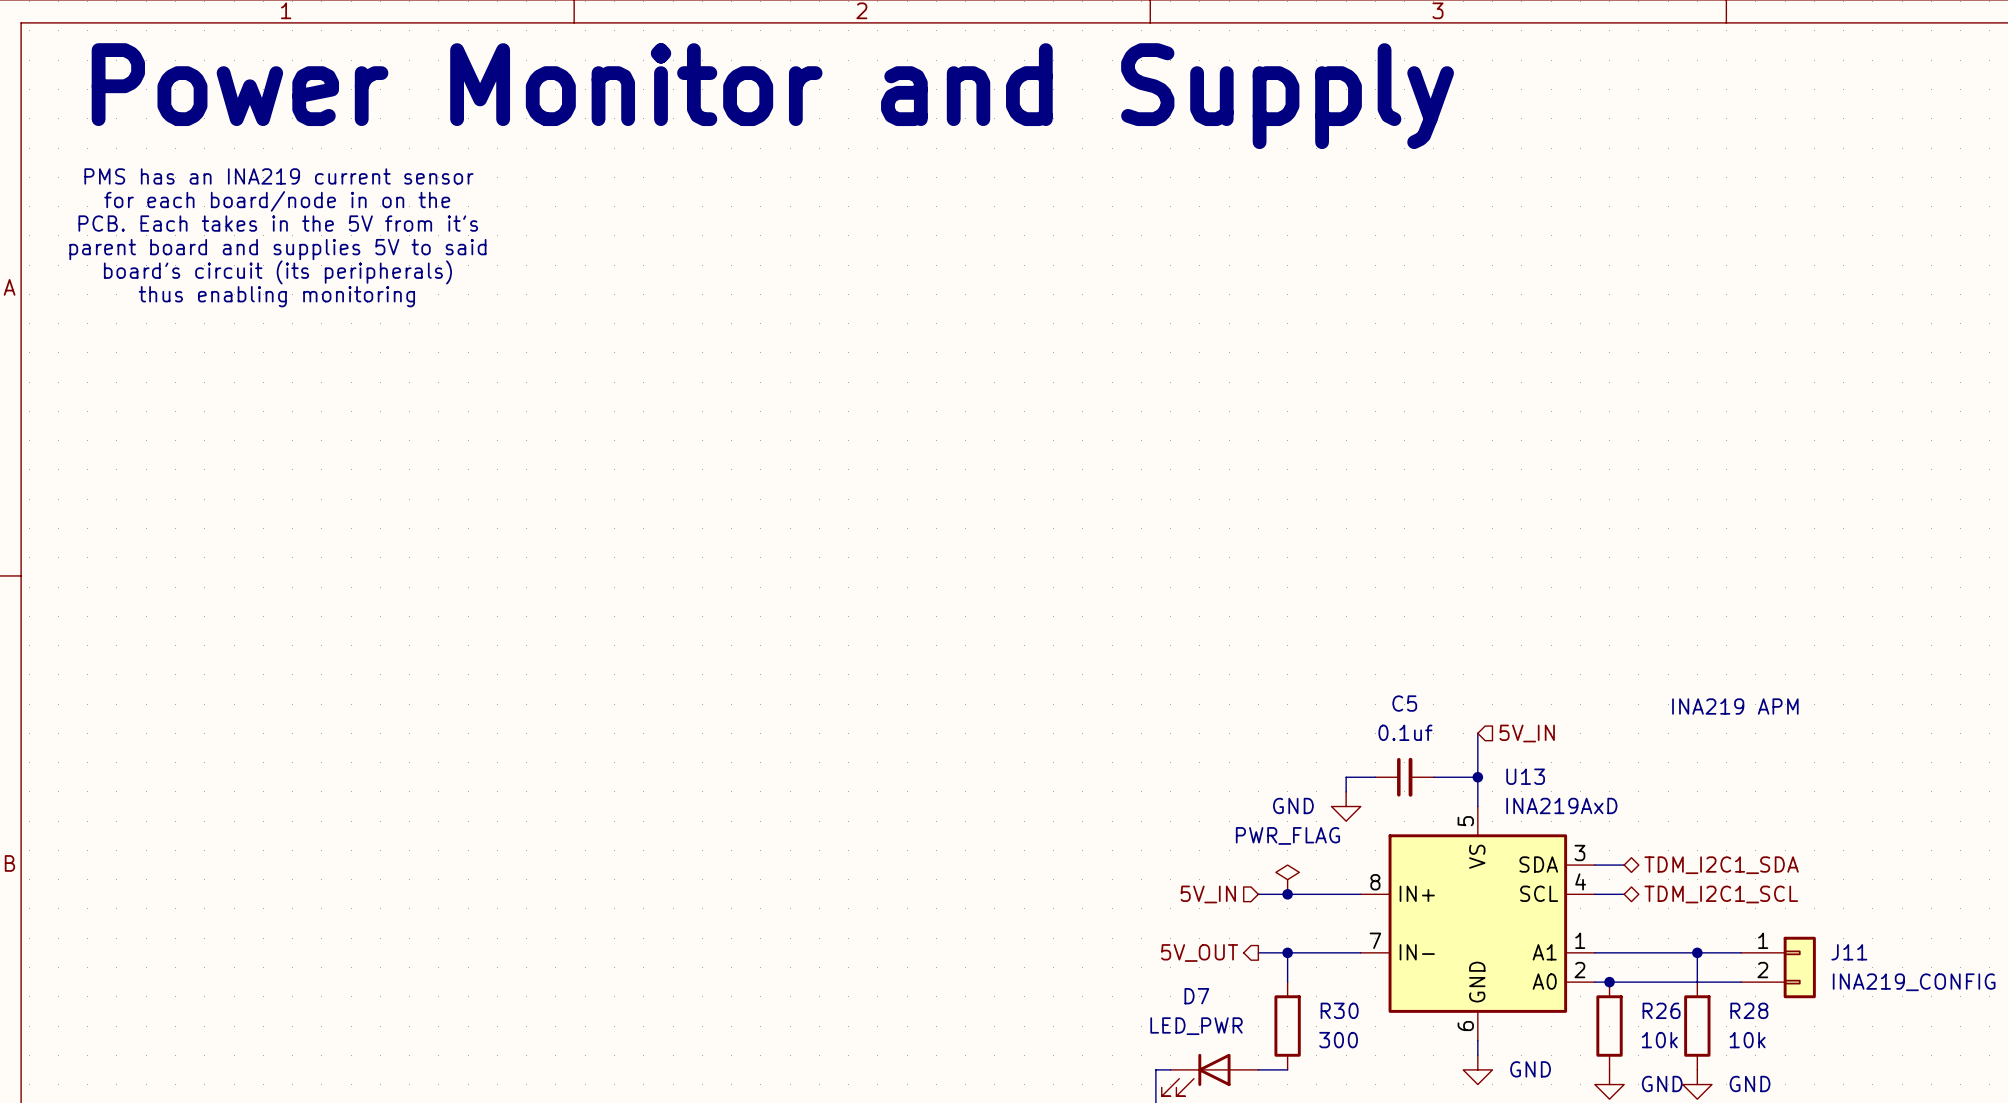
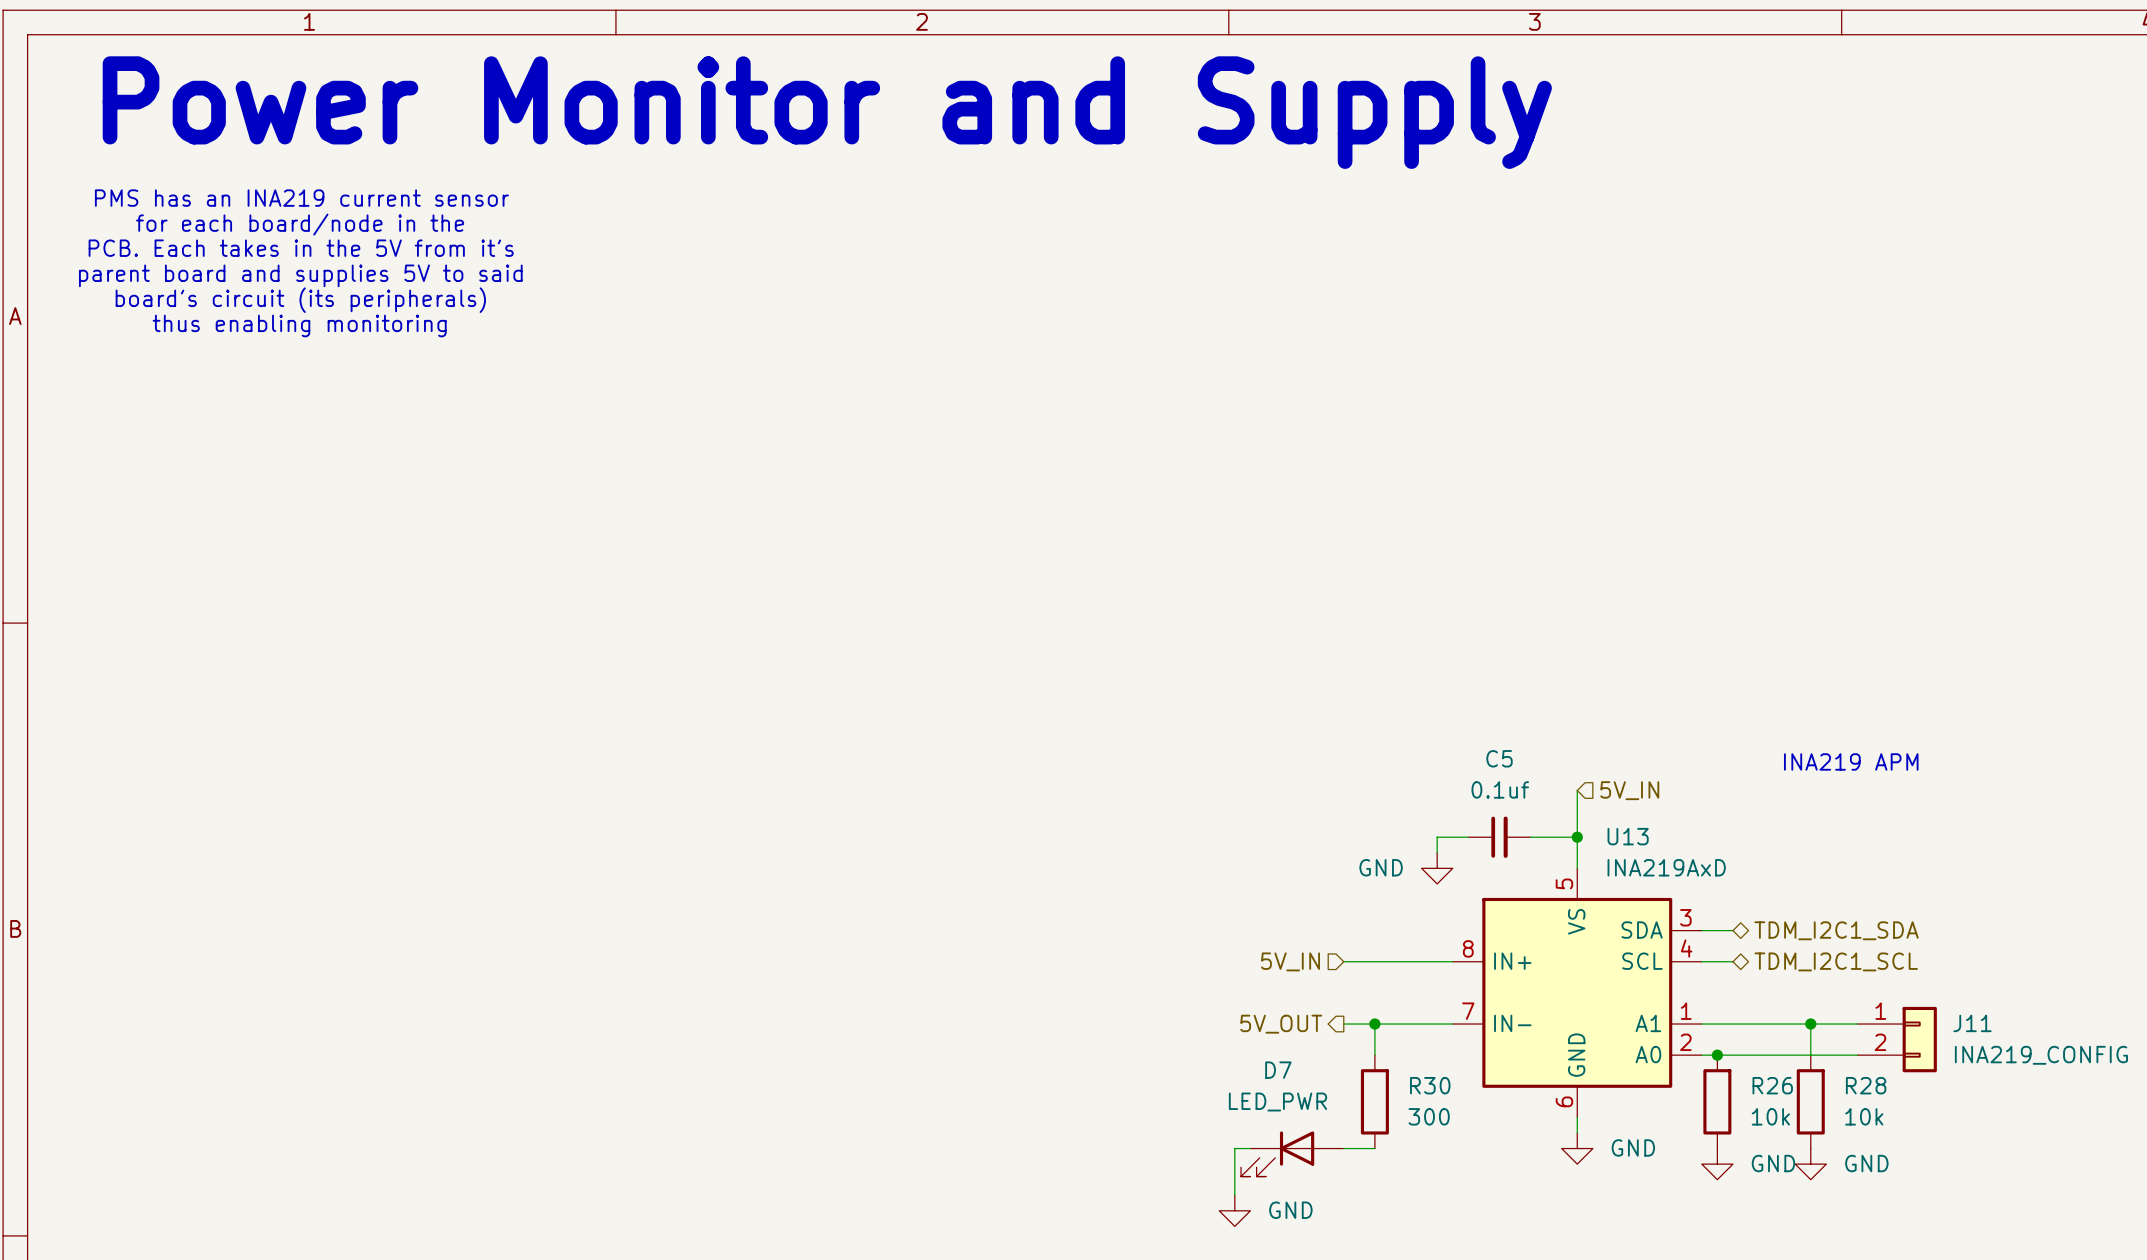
text: for each board/node in on the (277, 201) -> for each board/node in the (300, 224)
power symbol: PWR_FLAG (1287, 879) -> none
junction: (1287, 894) -> none

